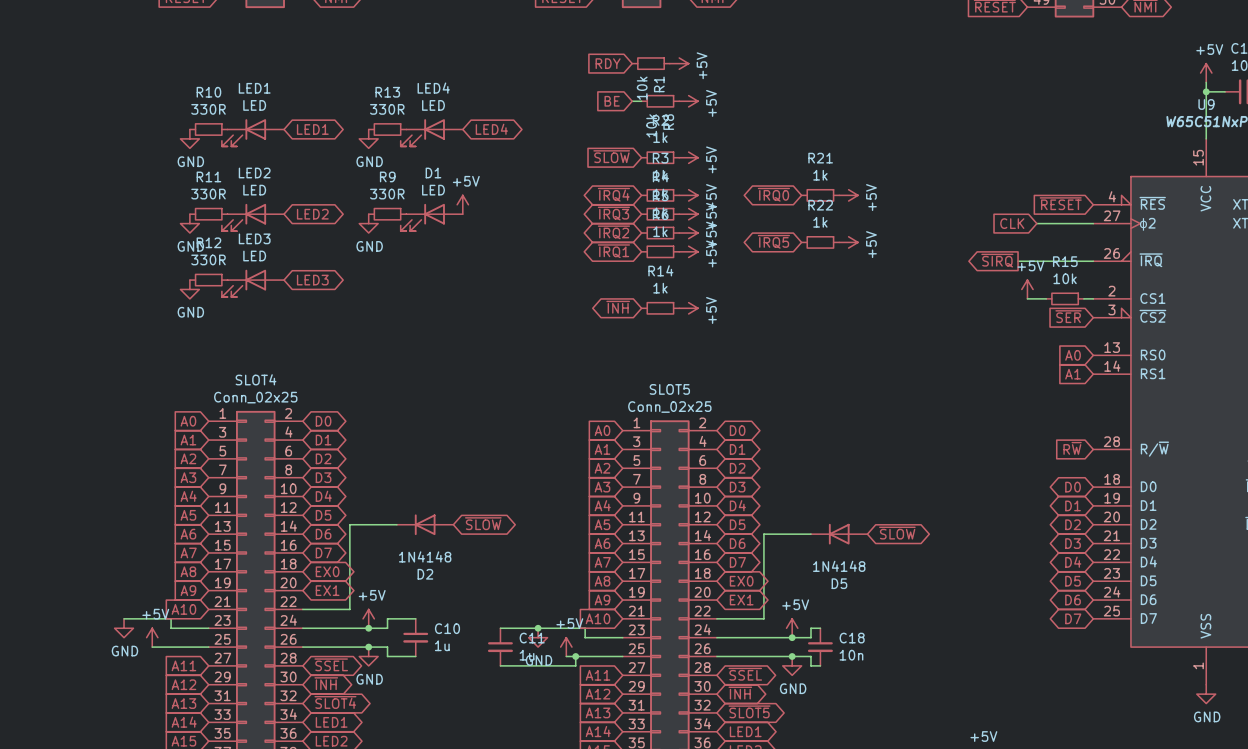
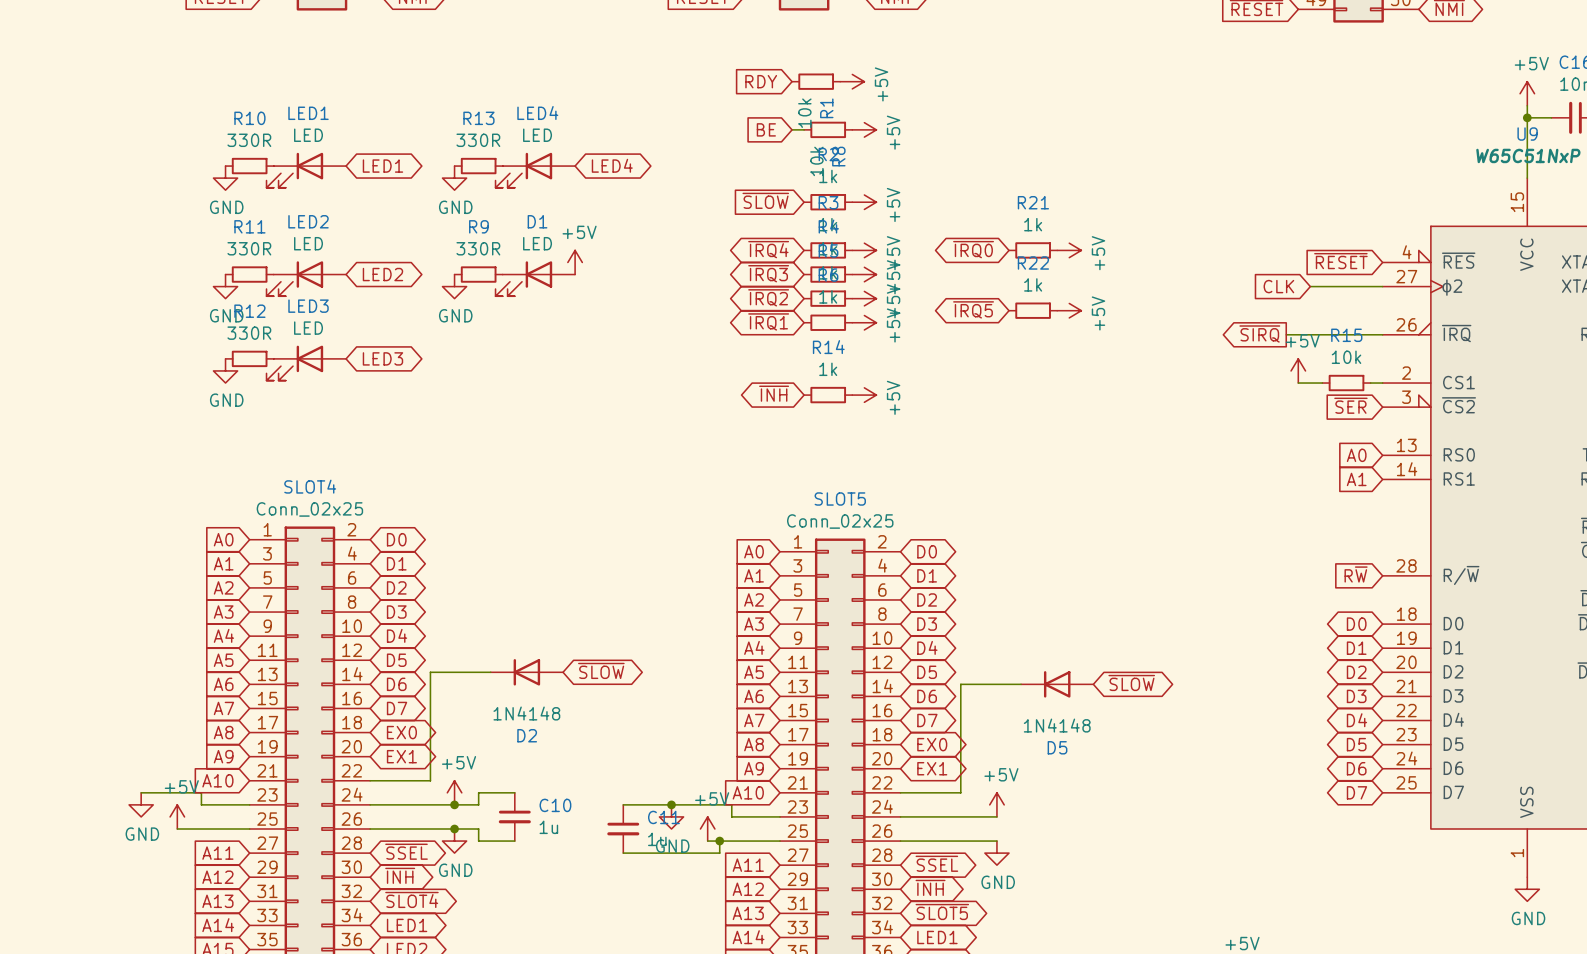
wire: (820, 628) (811, 628) (811, 637) (792, 637) -> none
junction: (792, 637) -> none
C18: 10n (820, 647) -> none
wire: (792, 656) (811, 656) (811, 665) (820, 665) -> none
junction: (792, 656) -> none

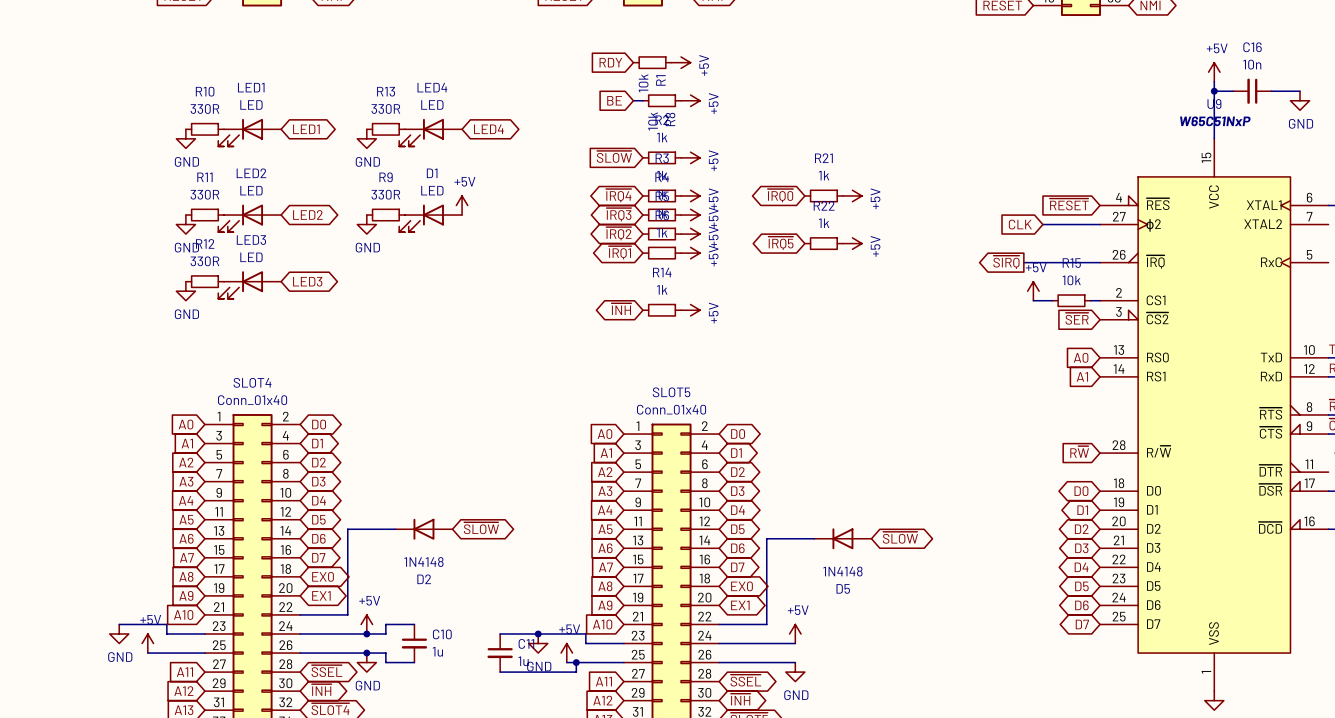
SLOT4 value: Conn_02x25 (309, 509) -> Conn_01x40 (252, 400)
SLOT5 value: Conn_02x25 (840, 521) -> Conn_01x40 (671, 409)

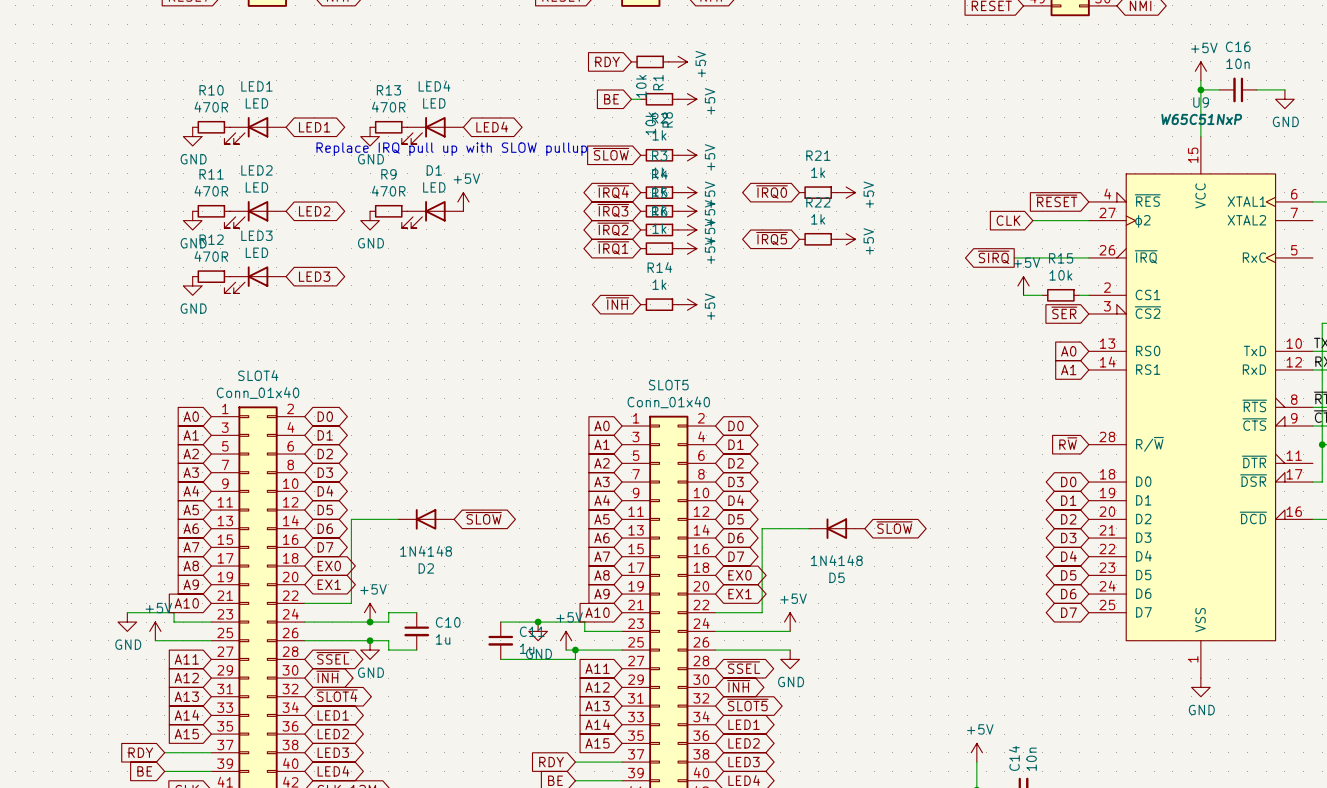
R10 value: 330R (204, 108) -> 470R (211, 107)
R13 value: 330R (385, 108) -> 470R (388, 107)
text: none -> Replace IRQ pull up with SLOW pullup (451, 149)
R11 value: 330R (204, 194) -> 470R (211, 191)
R9 value: 330R (385, 194) -> 470R (388, 191)
R12 value: 330R (204, 261) -> 470R (211, 256)

